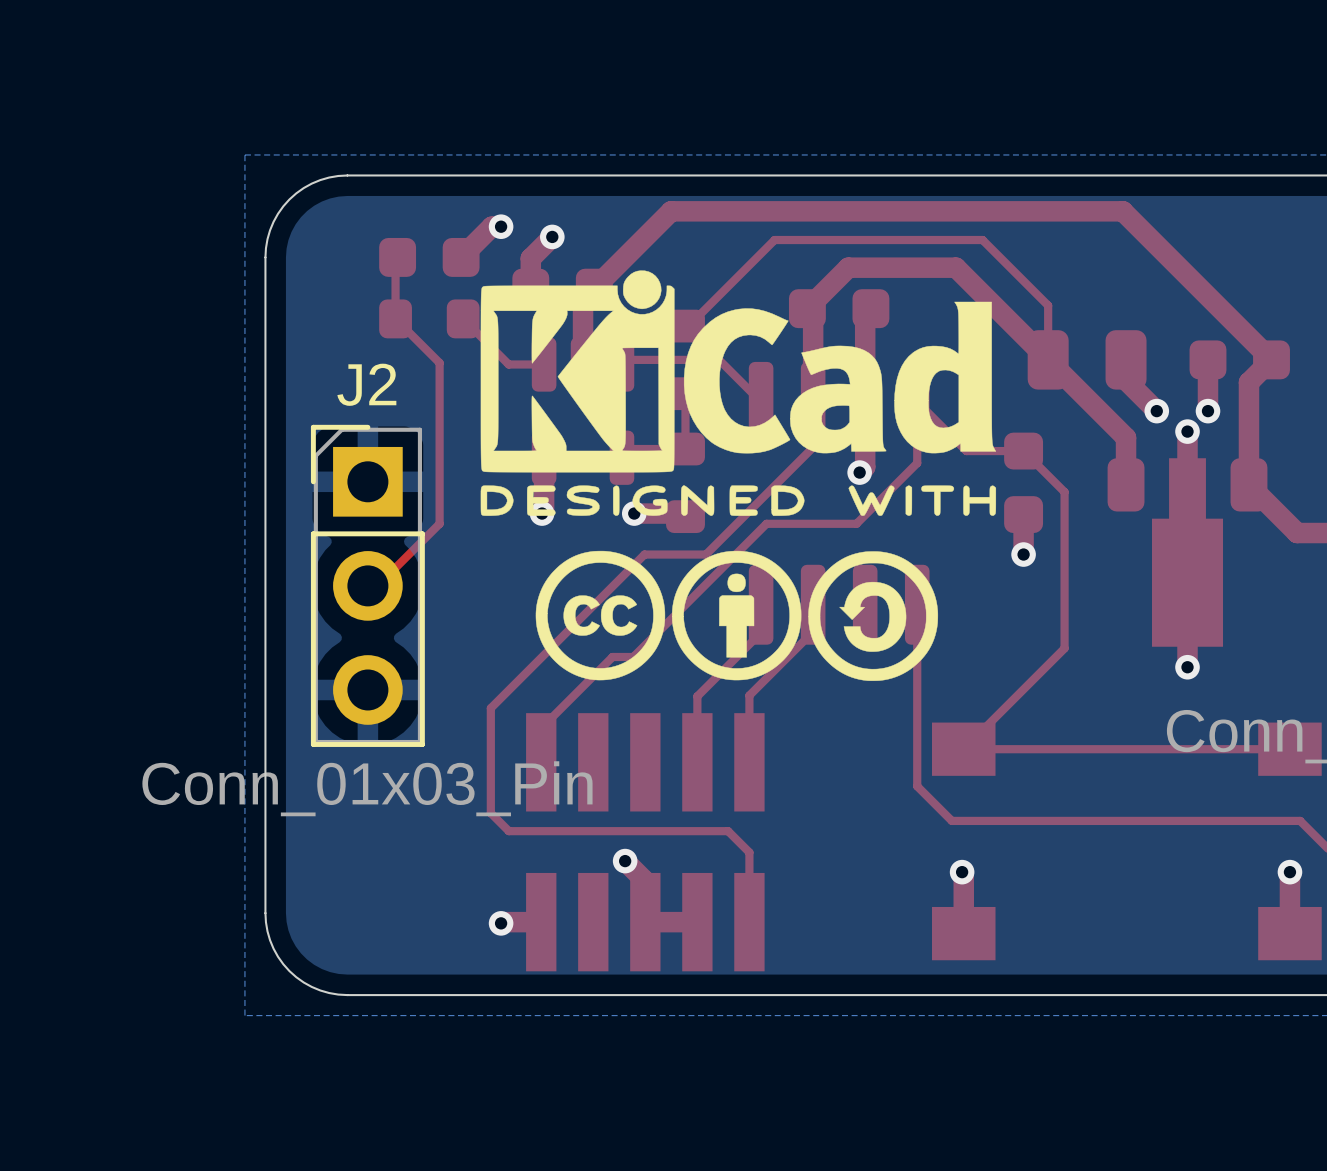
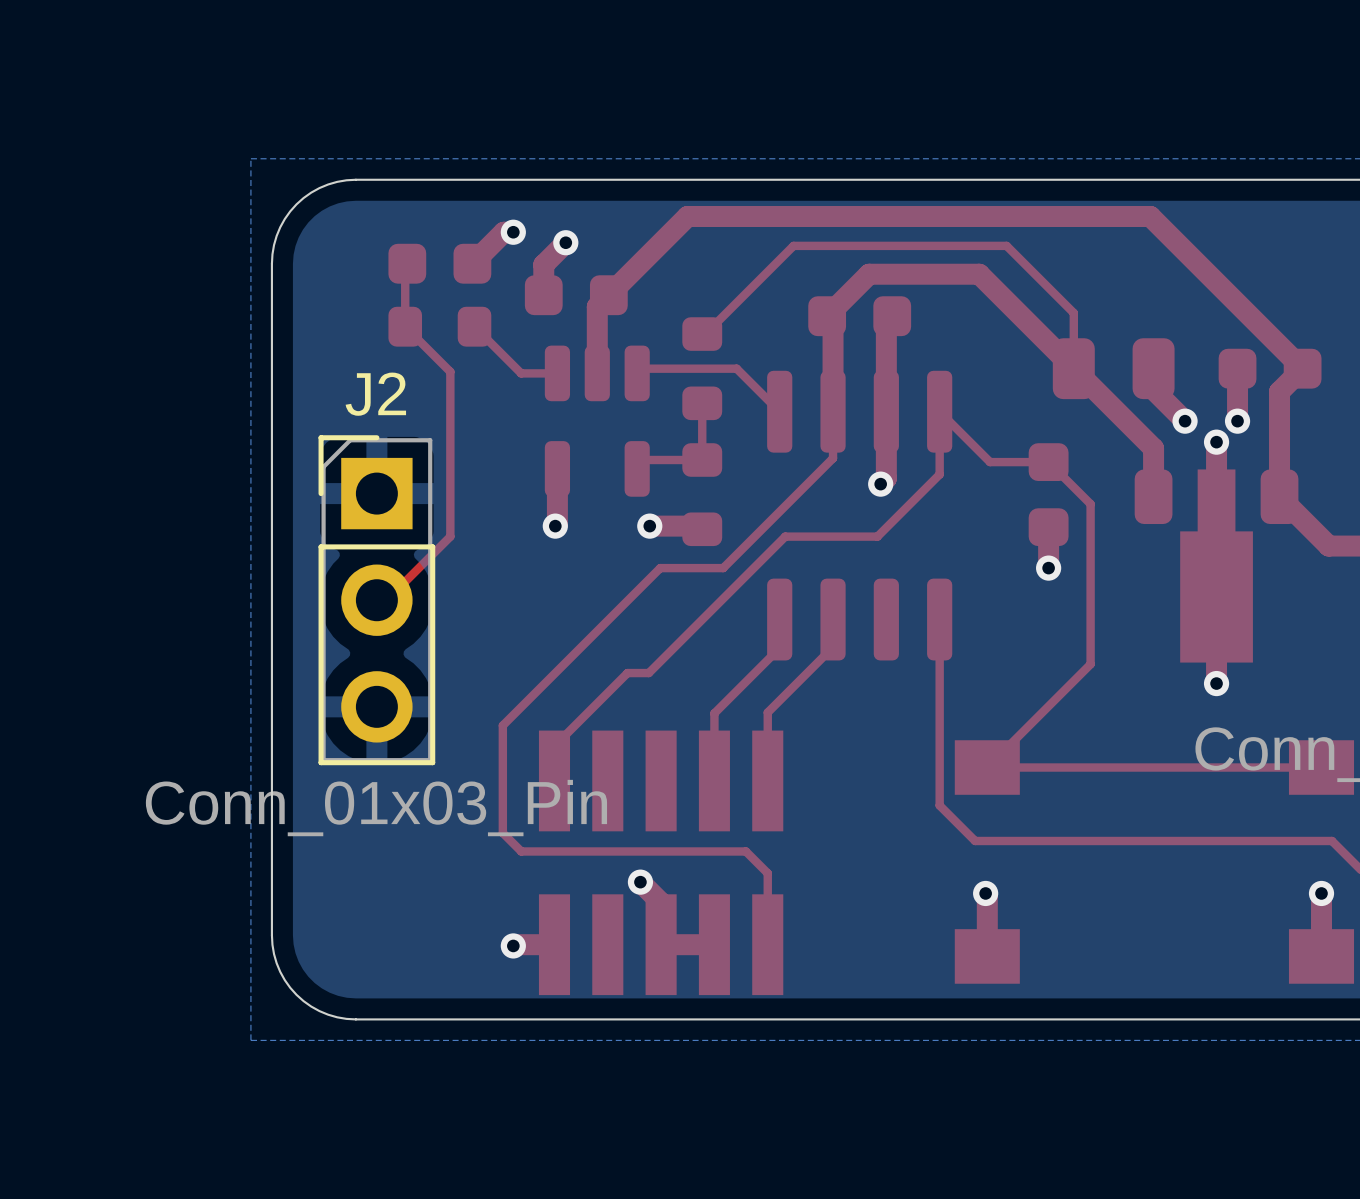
drawing: [480, 270, 997, 681] -> none

